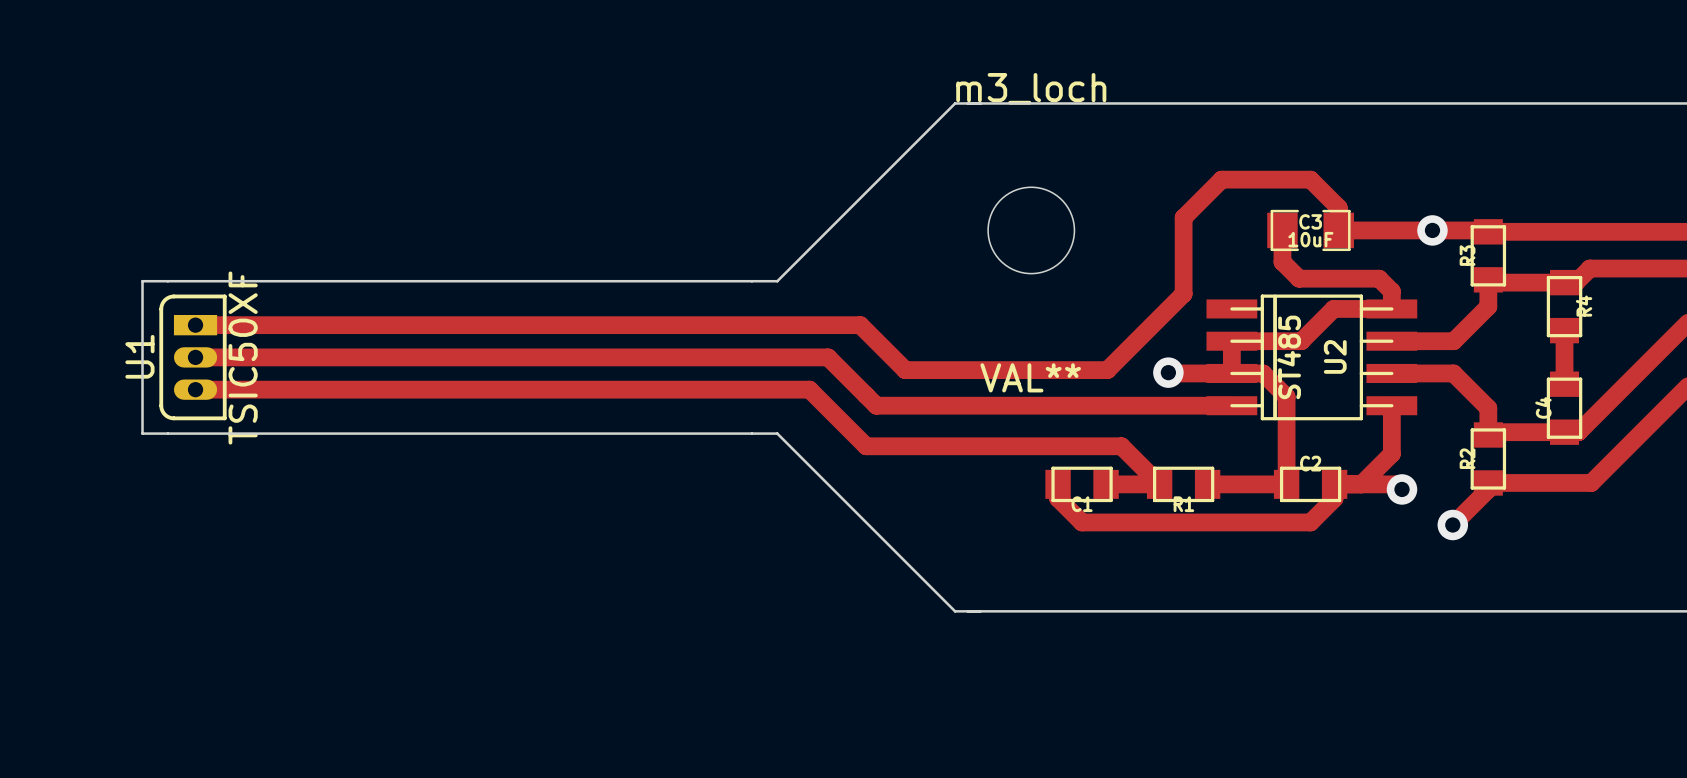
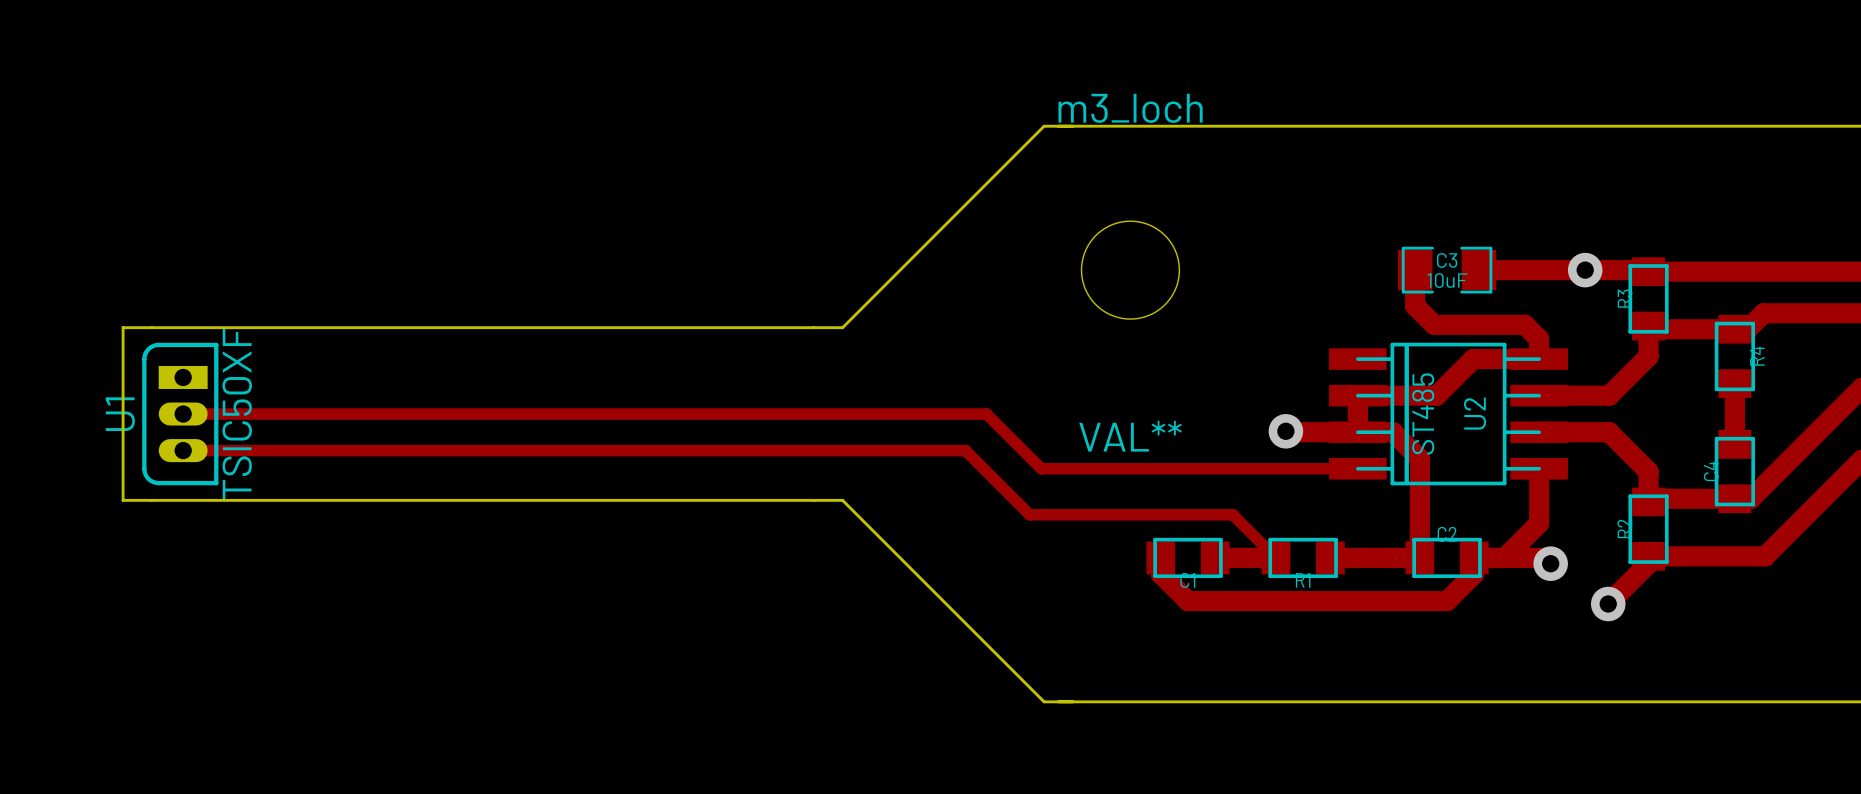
track: (1338, 230) (1338, 207) (1310, 179) (1221, 179) (1183, 217) (1183, 293) (1107, 370) (905, 370) (860, 325) (195, 325) -> none
track width: thick (195, 357) (828, 357) -> thin (183, 414) (900, 414)
track: (828, 357) (876, 405) (952, 405) -> (900, 414) (986, 414) (1041, 468)
track width: thick (195, 389) (809, 389) -> thin (183, 450) (879, 450)
track: (809, 389) (866, 446) (942, 446) -> (879, 450) (965, 450) (1029, 514)
track width: thick (952, 405) (1231, 405) -> thin (1041, 468) (1357, 468)
track width: thick (942, 446) (1121, 446) (1159, 484) -> thin (1029, 514) (1232, 514) (1275, 557)

